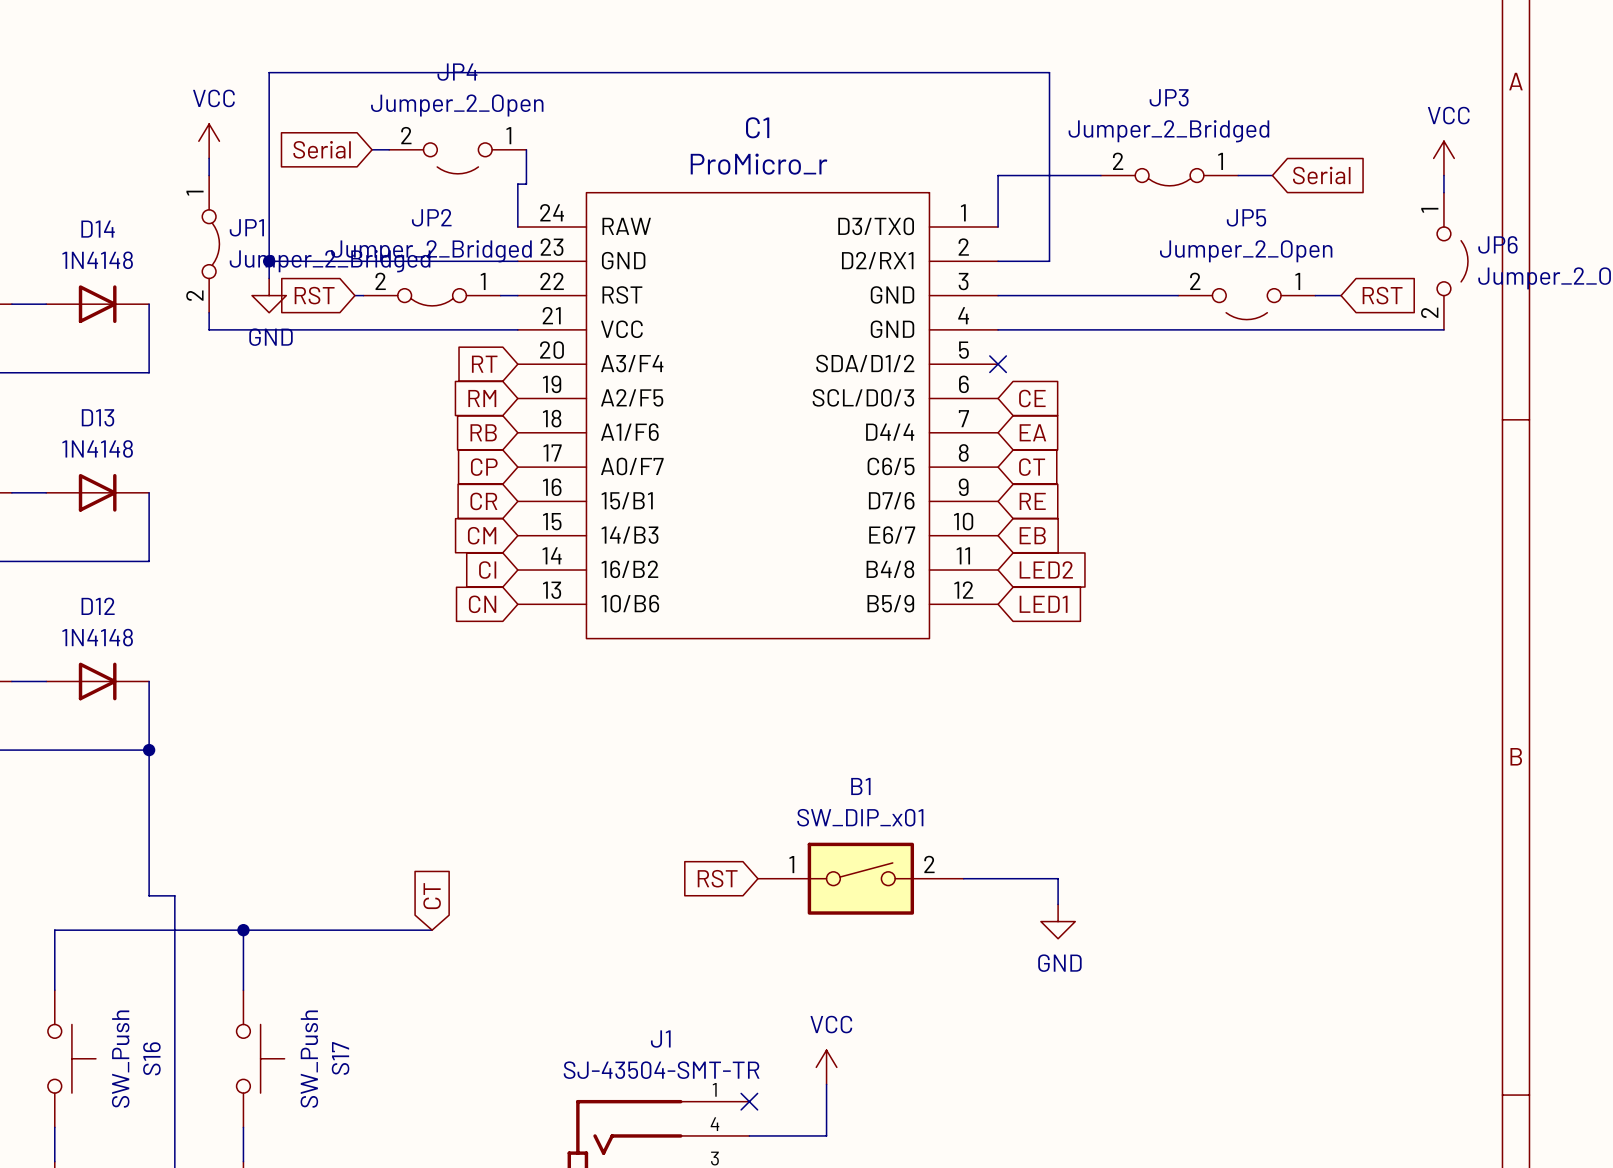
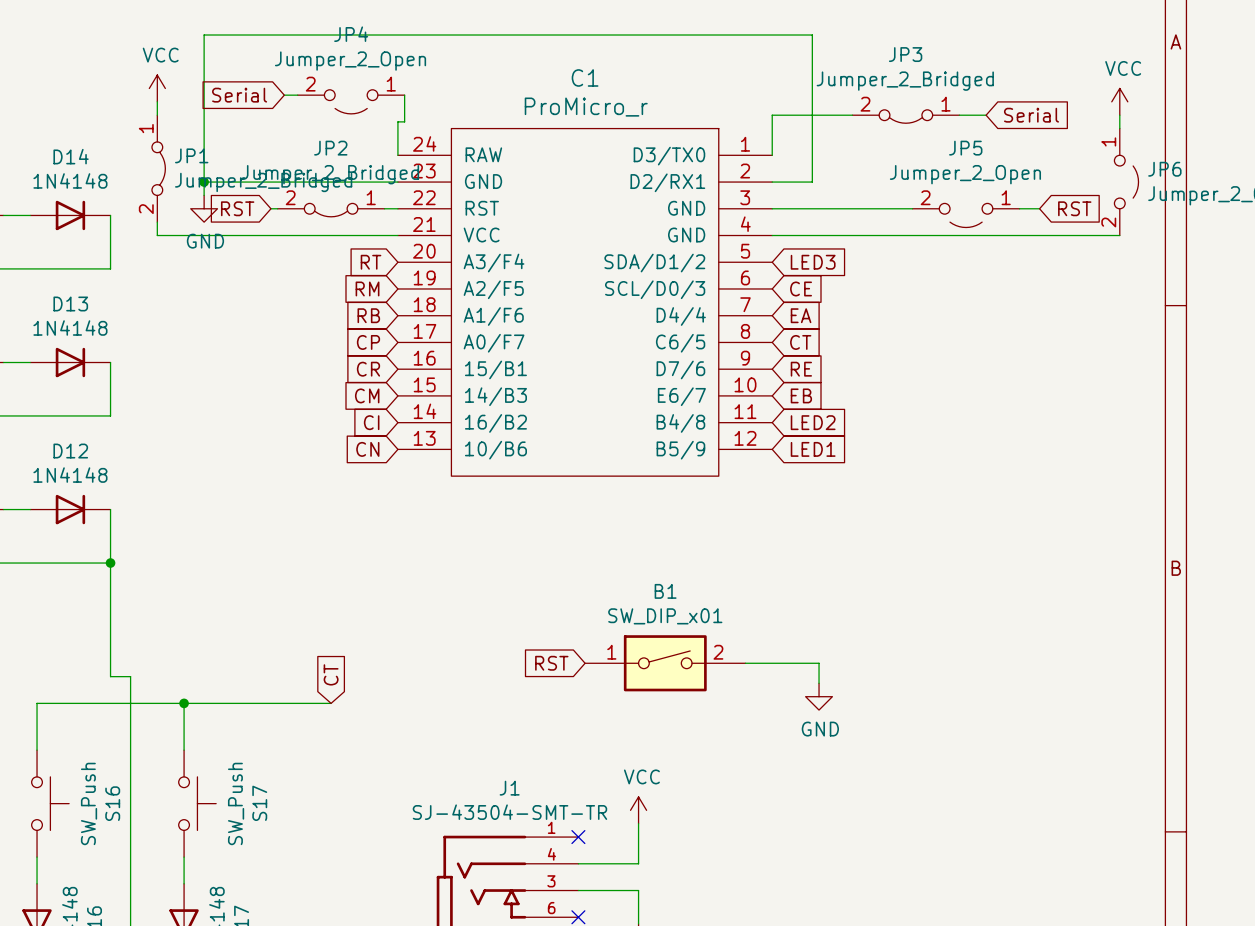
no-connect mark: (998, 364) -> none
global label: none -> LED3 (813, 262)

